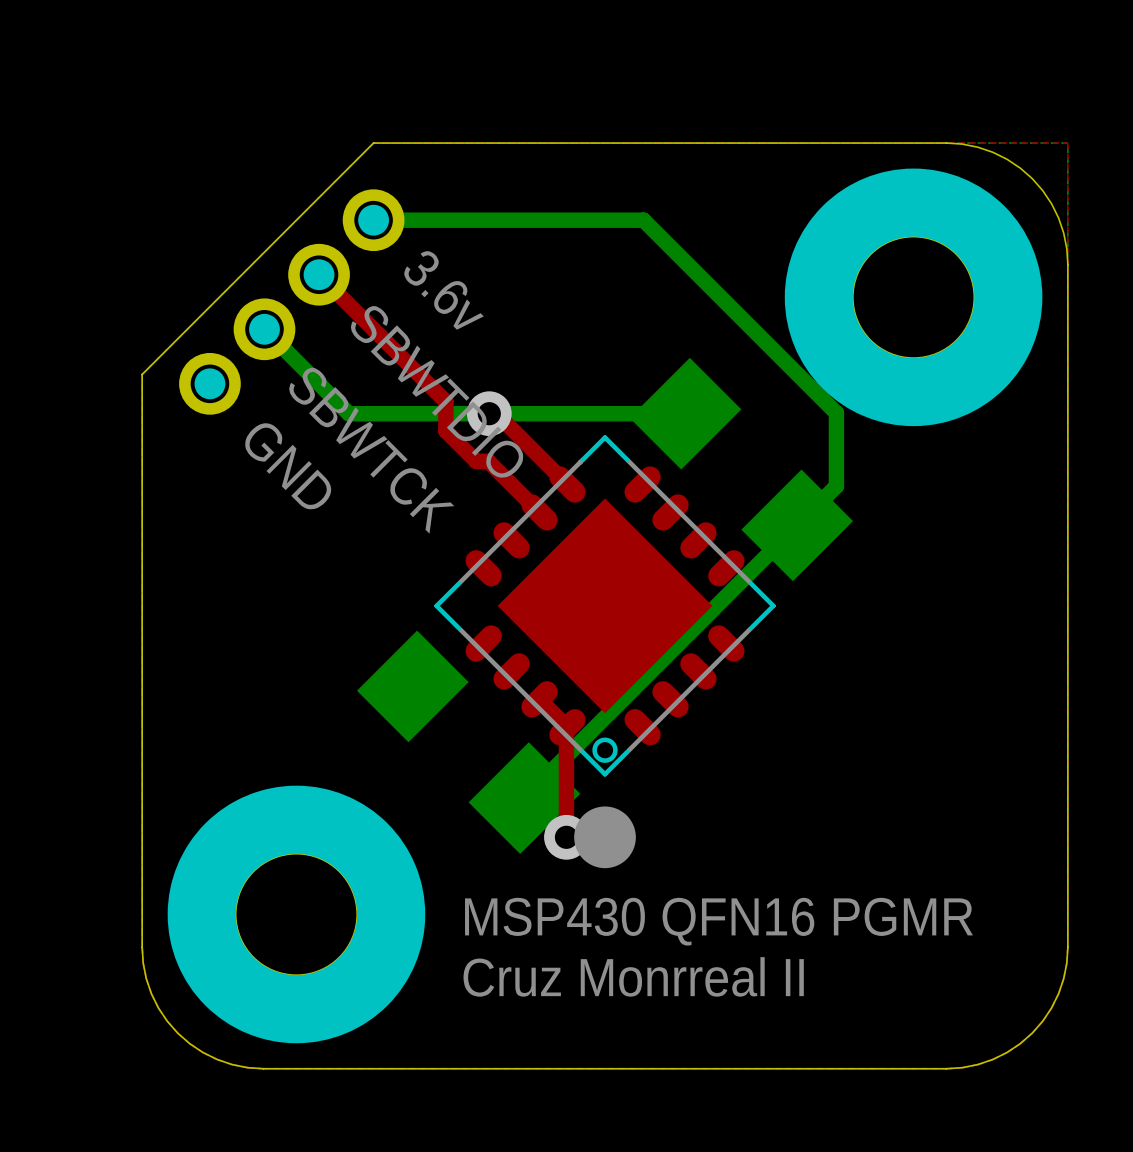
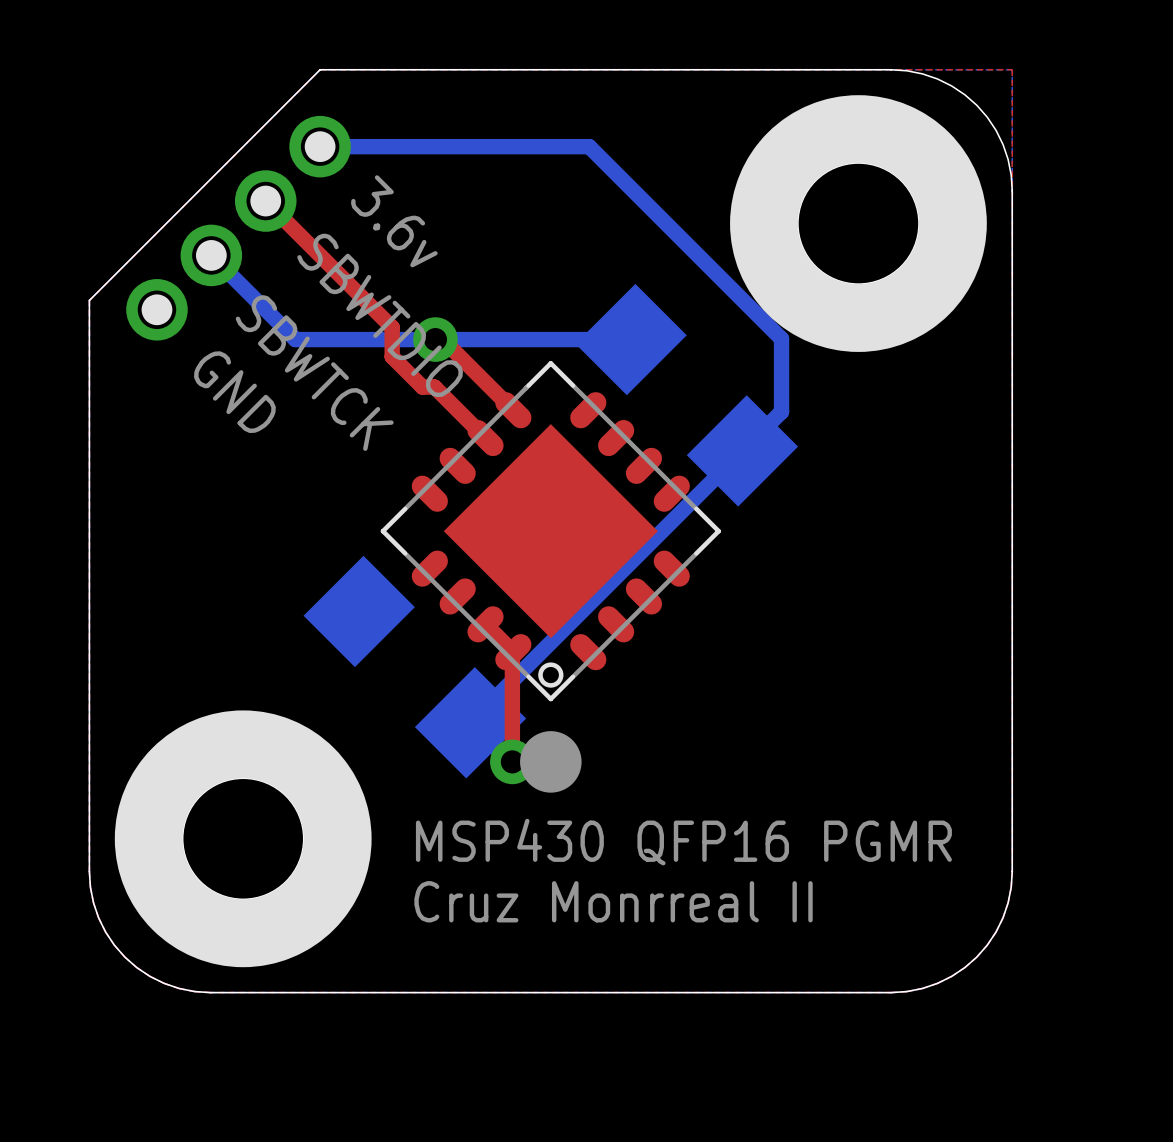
text: MSP430 QFN16 PGMR (718, 921) -> MSP430 QFP16 PGMR (683, 842)

